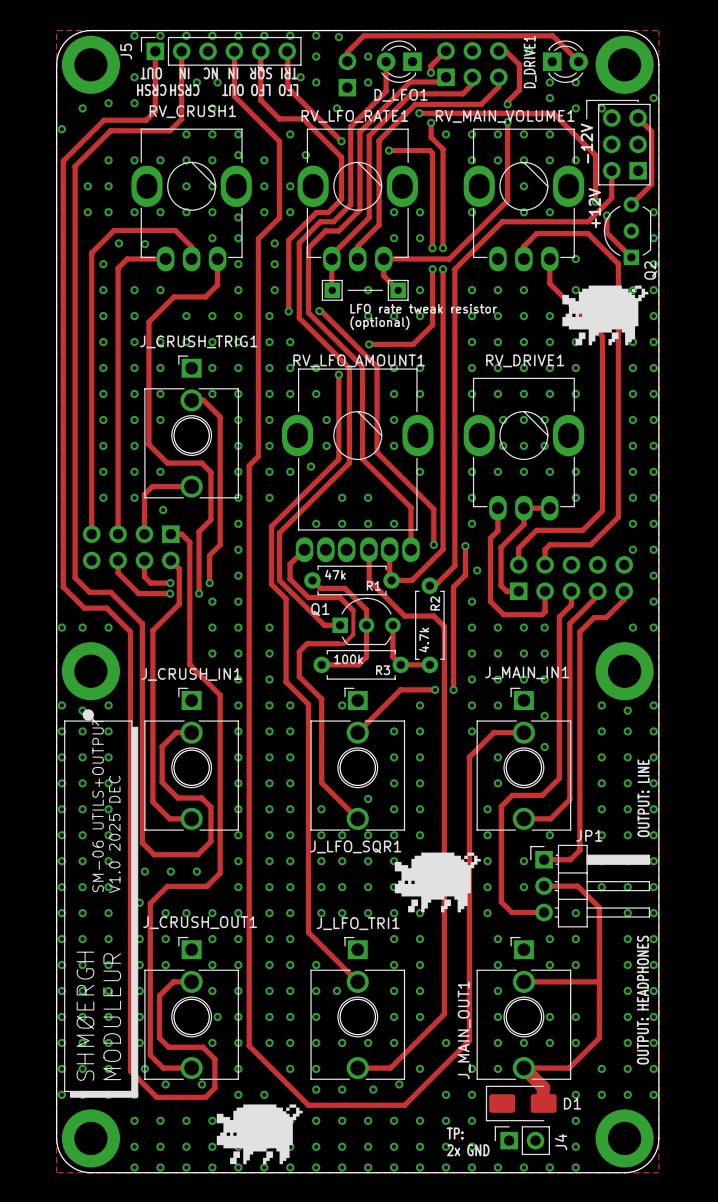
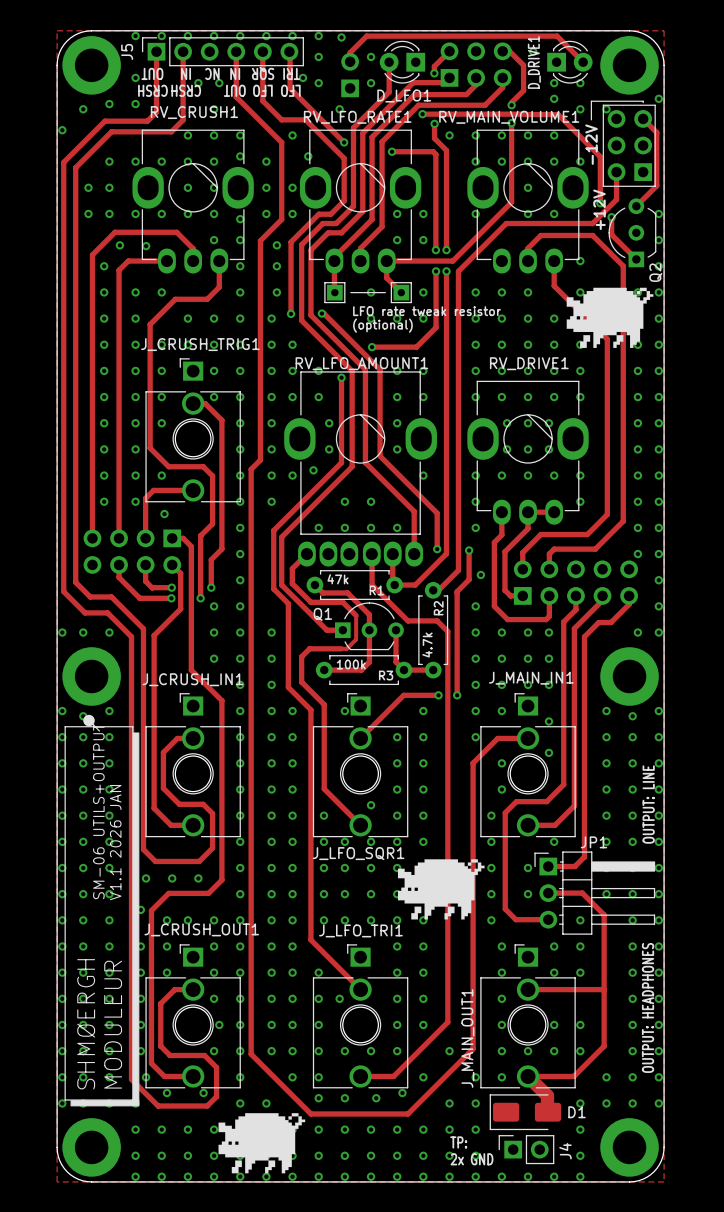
text: V1.0 2025 DEC (114, 834) -> V1.1 2026 JAN (115, 842)

